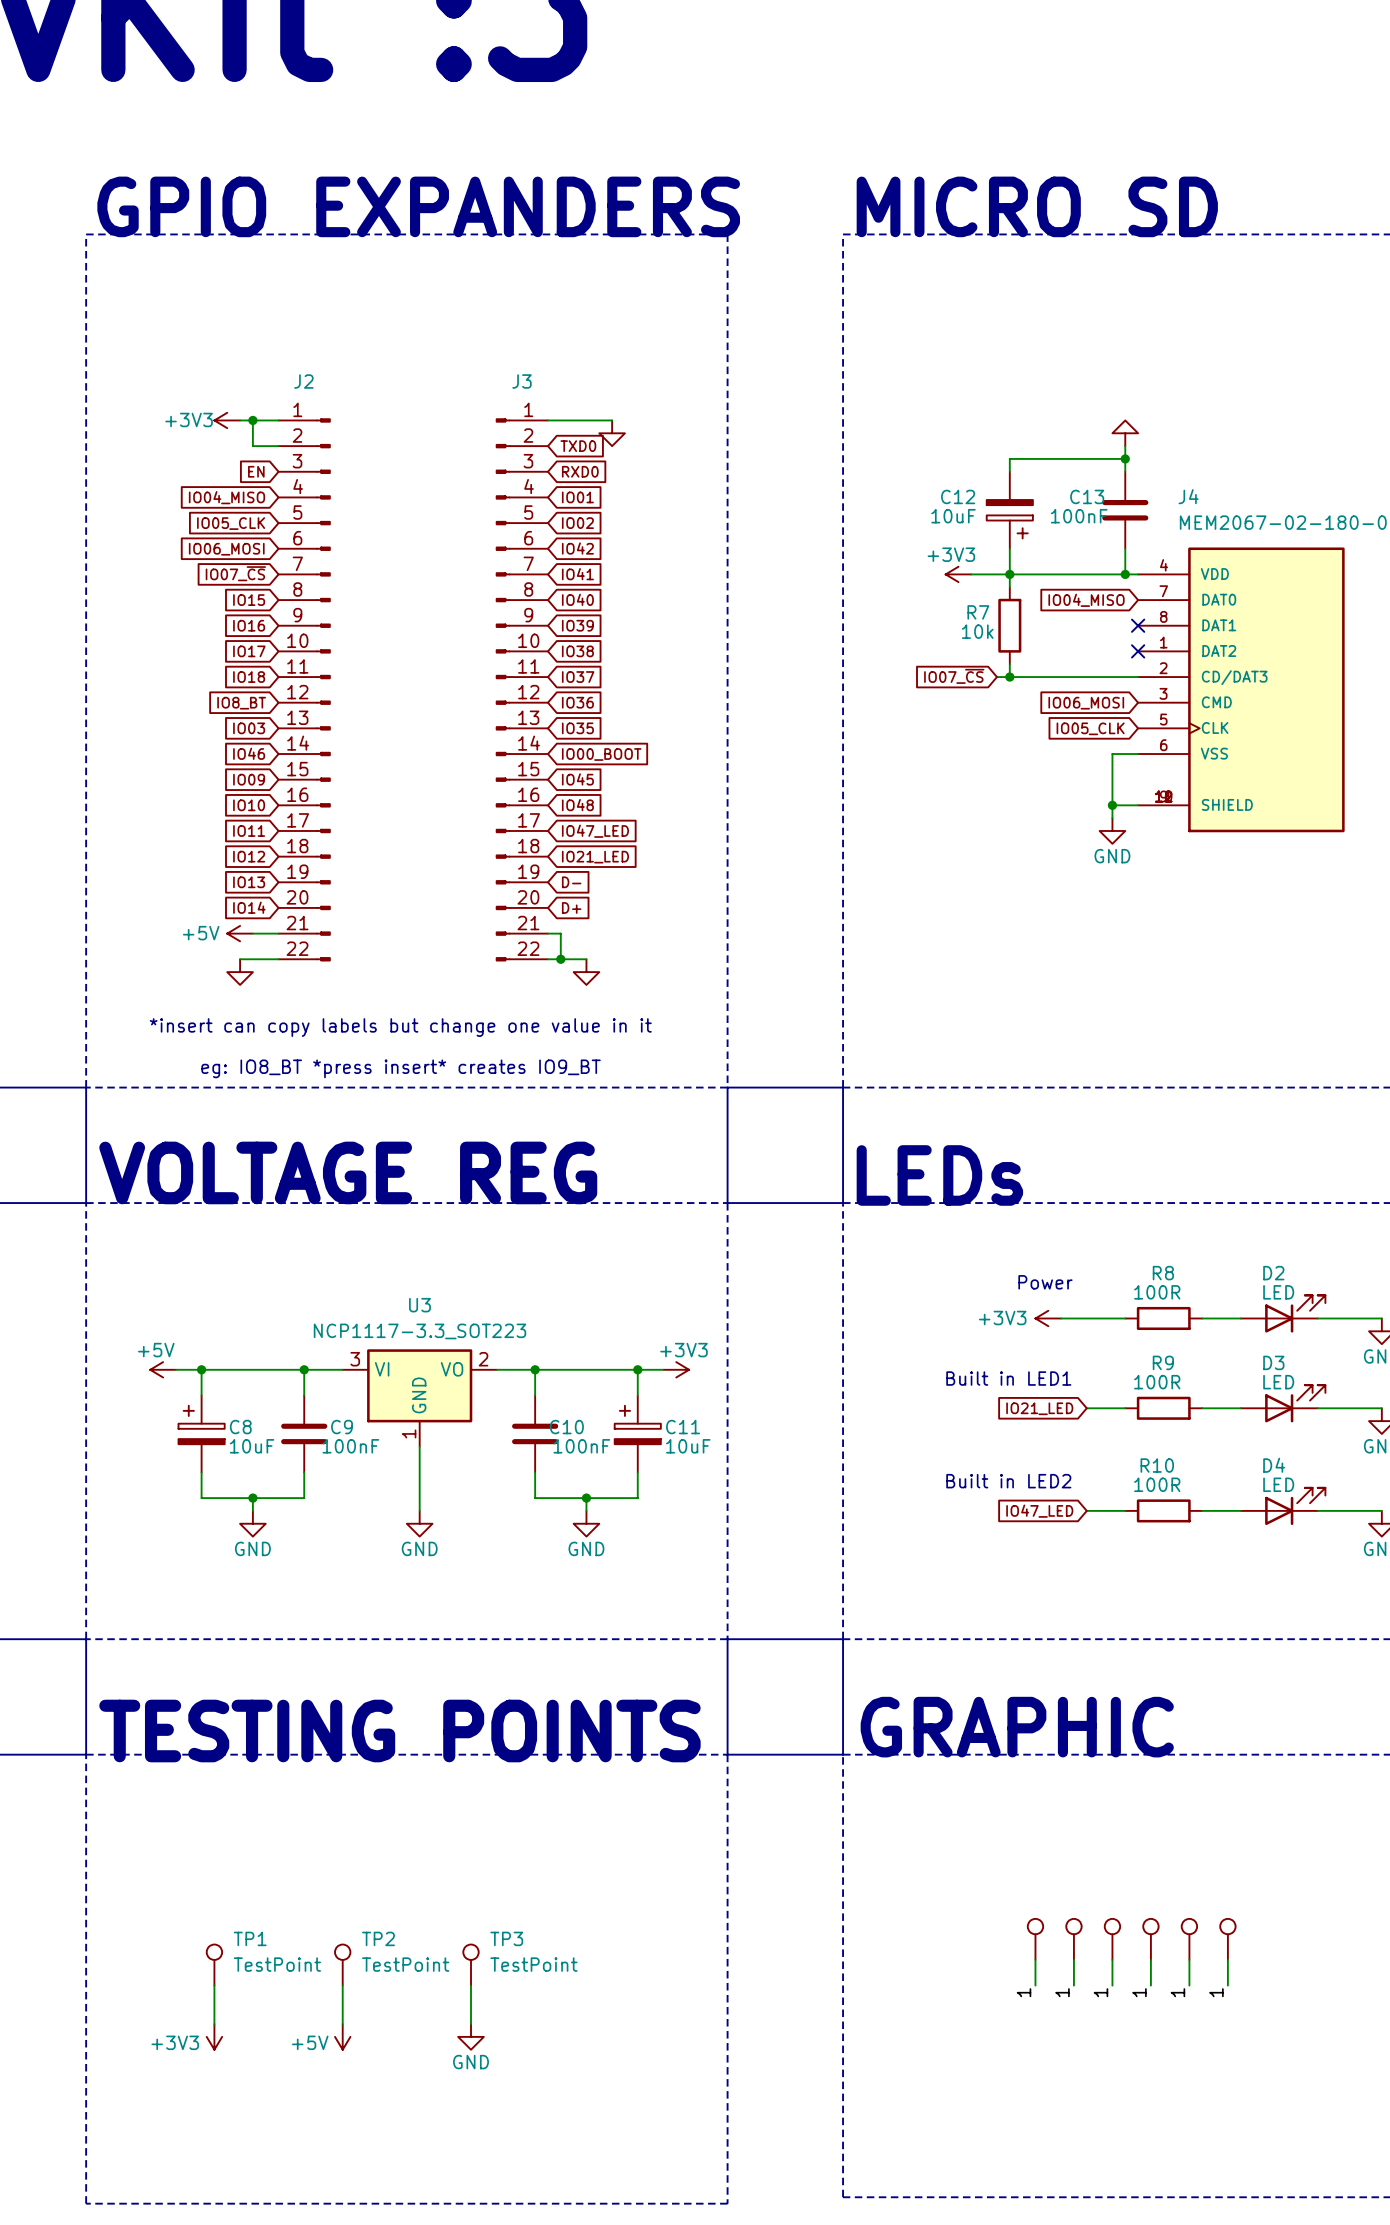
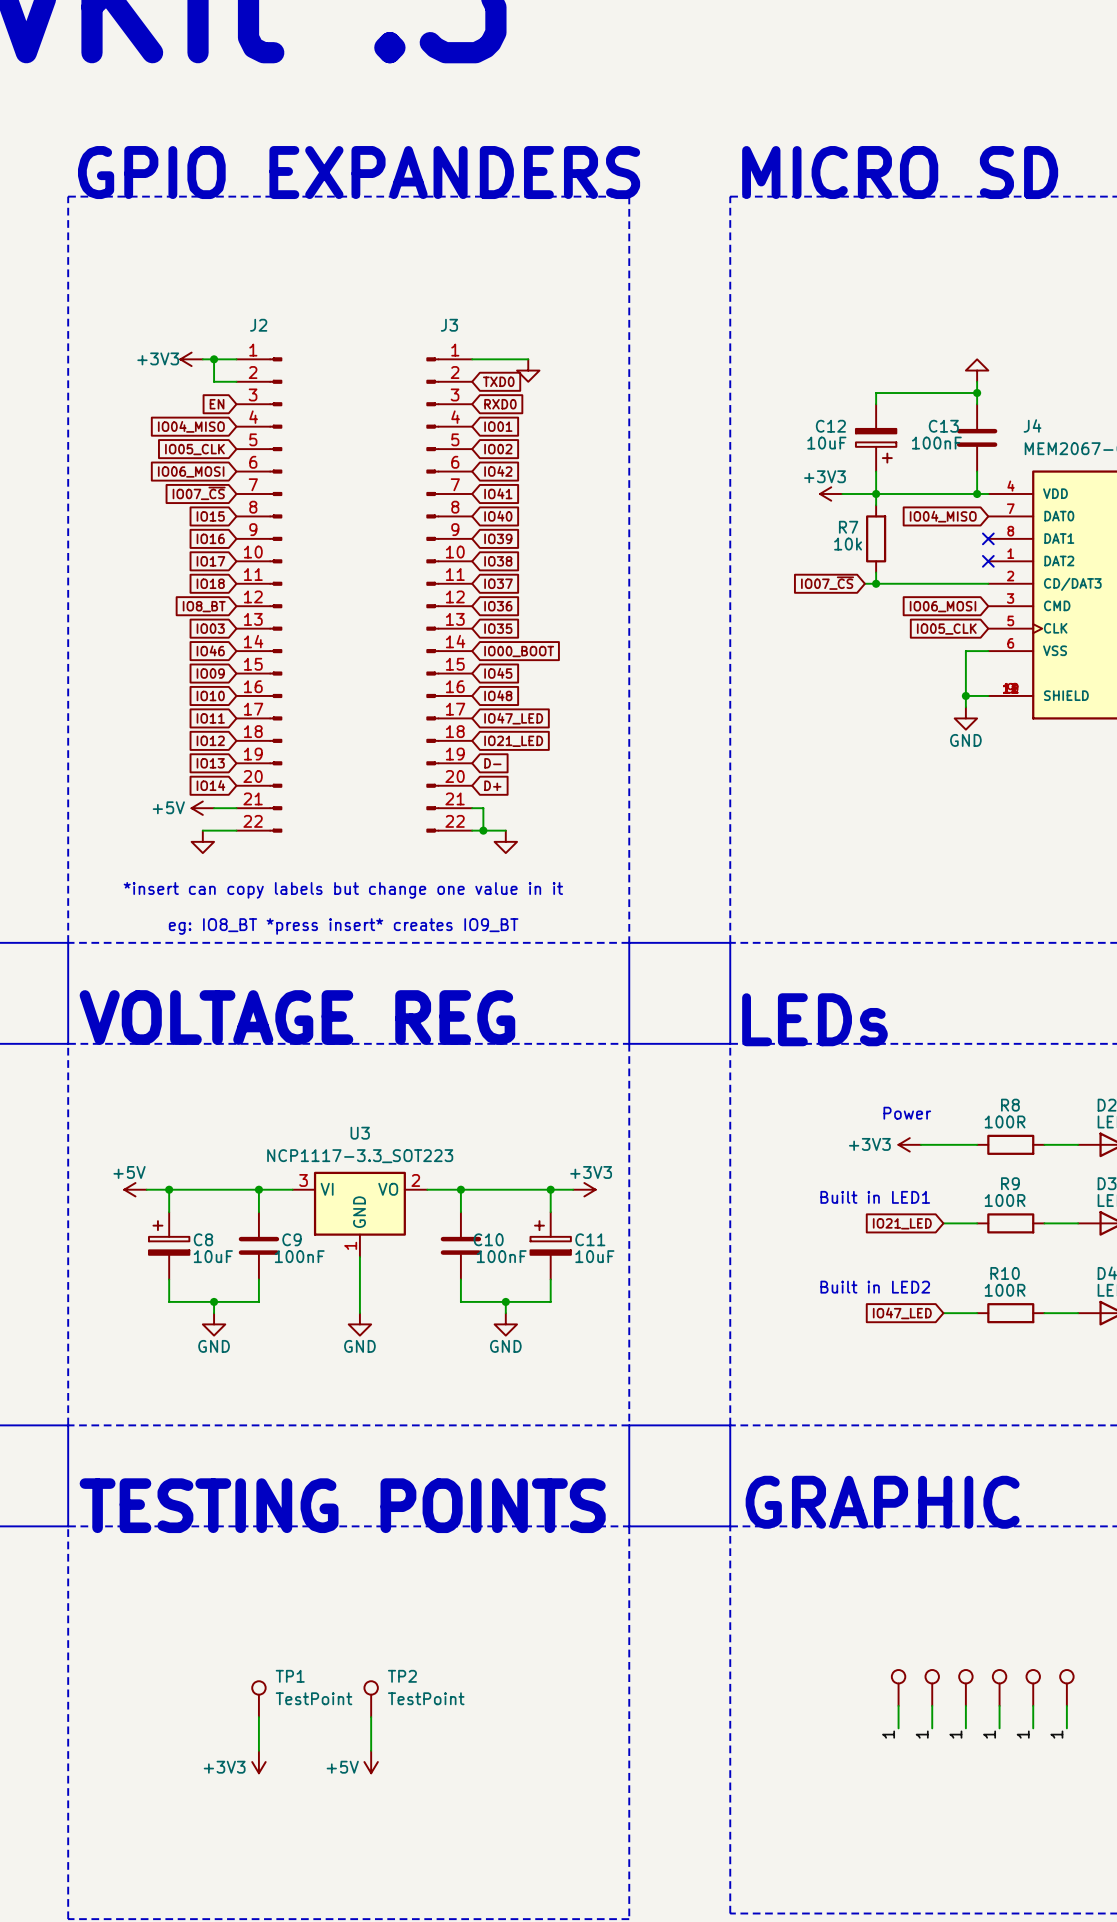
TP1 position: (214, 1965) -> (258, 1699)
TP2 position: (342, 1965) -> (371, 1699)
TP3: TestPoint (471, 1965) -> none
wire: (214, 1985) (214, 2024) -> none
wire: (342, 1985) (342, 2024) -> (258, 1717) (258, 1750)
wire: (471, 1985) (471, 2024) -> (371, 1717) (371, 1750)
power symbol position: +3V3 (214, 2036) -> +3V3 (258, 1762)
power symbol position: +5V (342, 2036) -> +5V (371, 1762)
power symbol: GND (471, 2036) -> none

